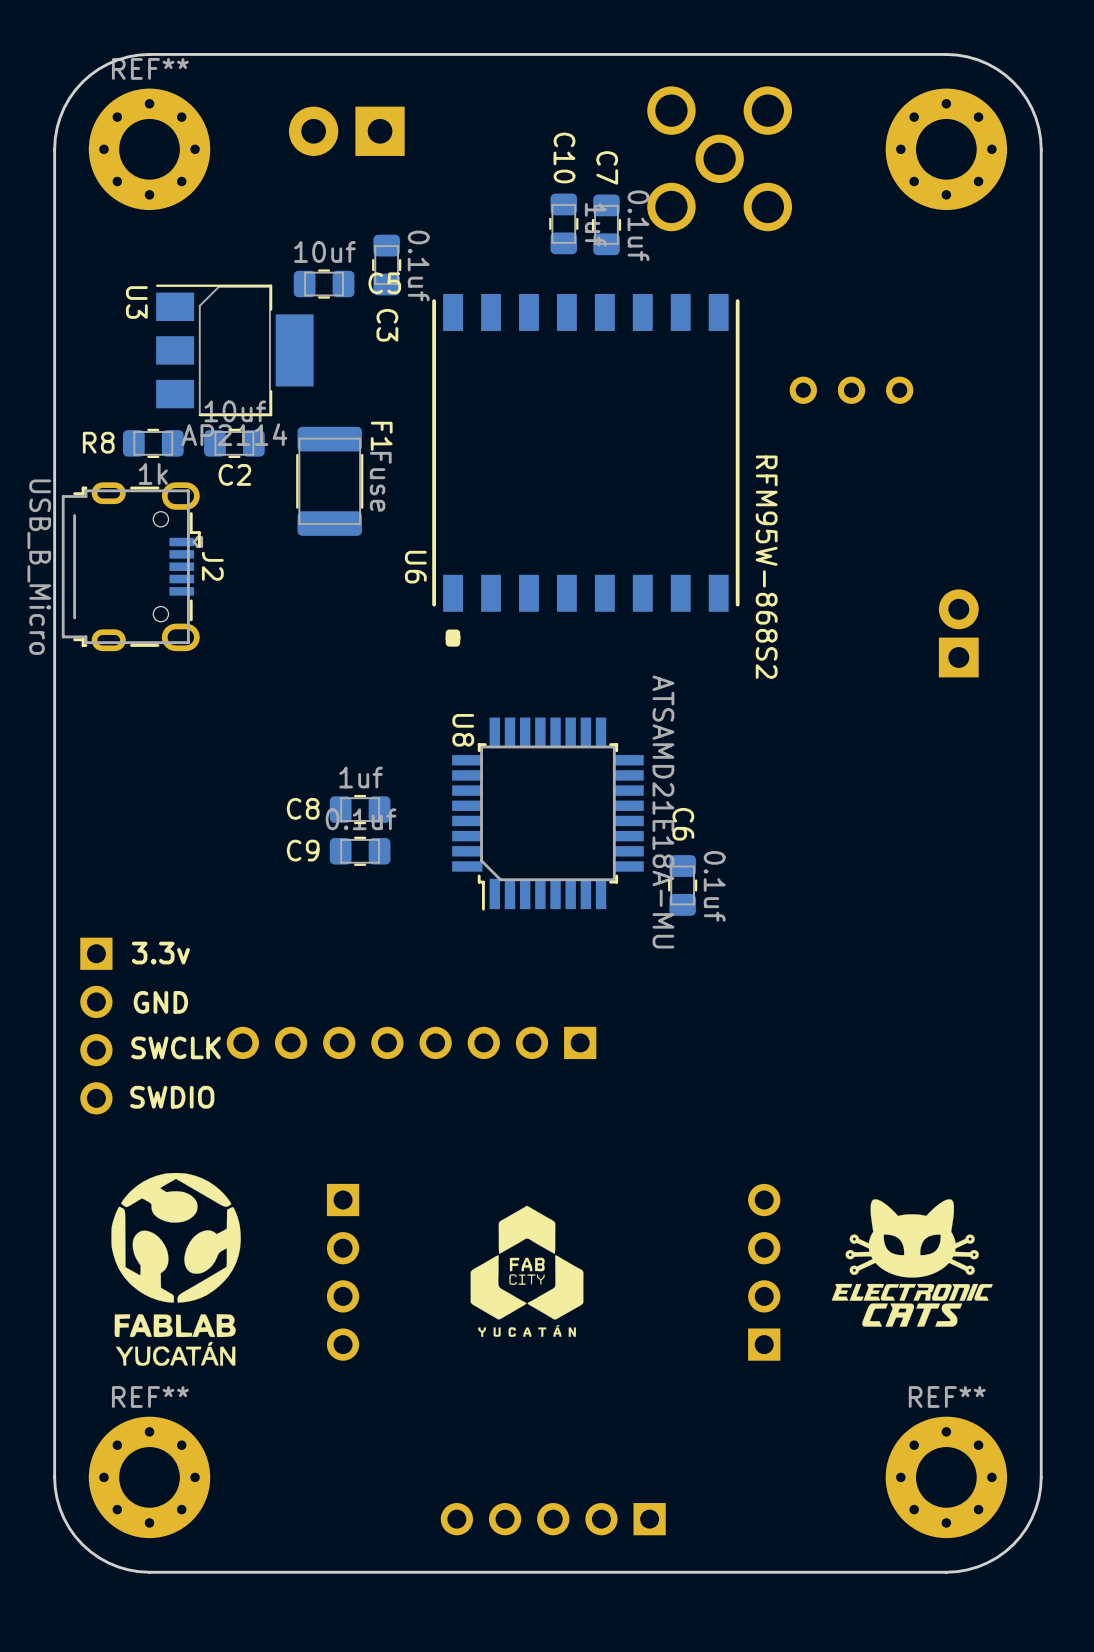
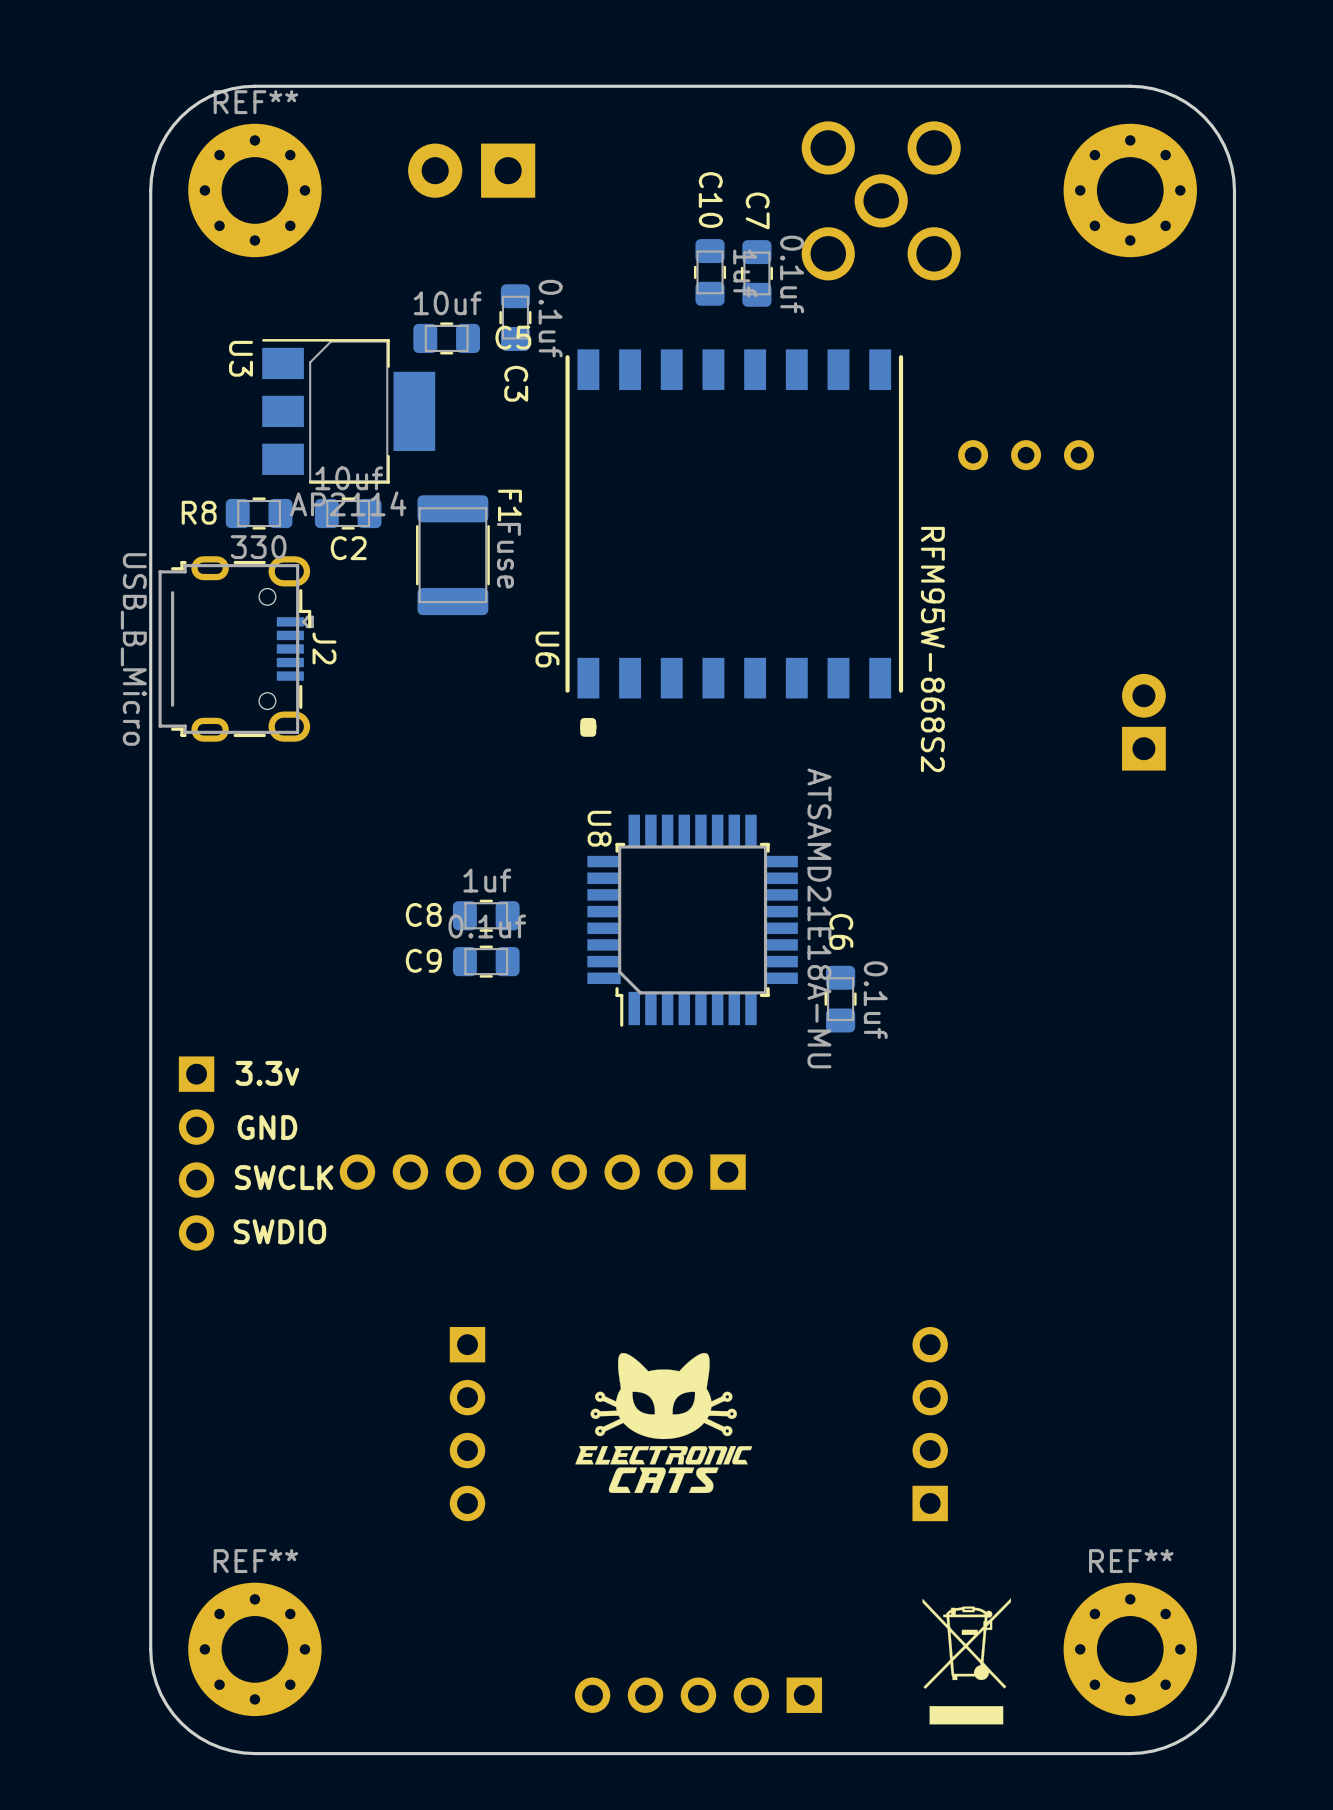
R8 value: 1k (153, 473) -> 330 (258, 547)
drawing: [111, 1172, 241, 1366] -> none
drawing: [470, 1205, 584, 1337] -> none
drawing position: (912, 1263) -> (663, 1423)
drawing: none -> [922, 1598, 1012, 1725]

